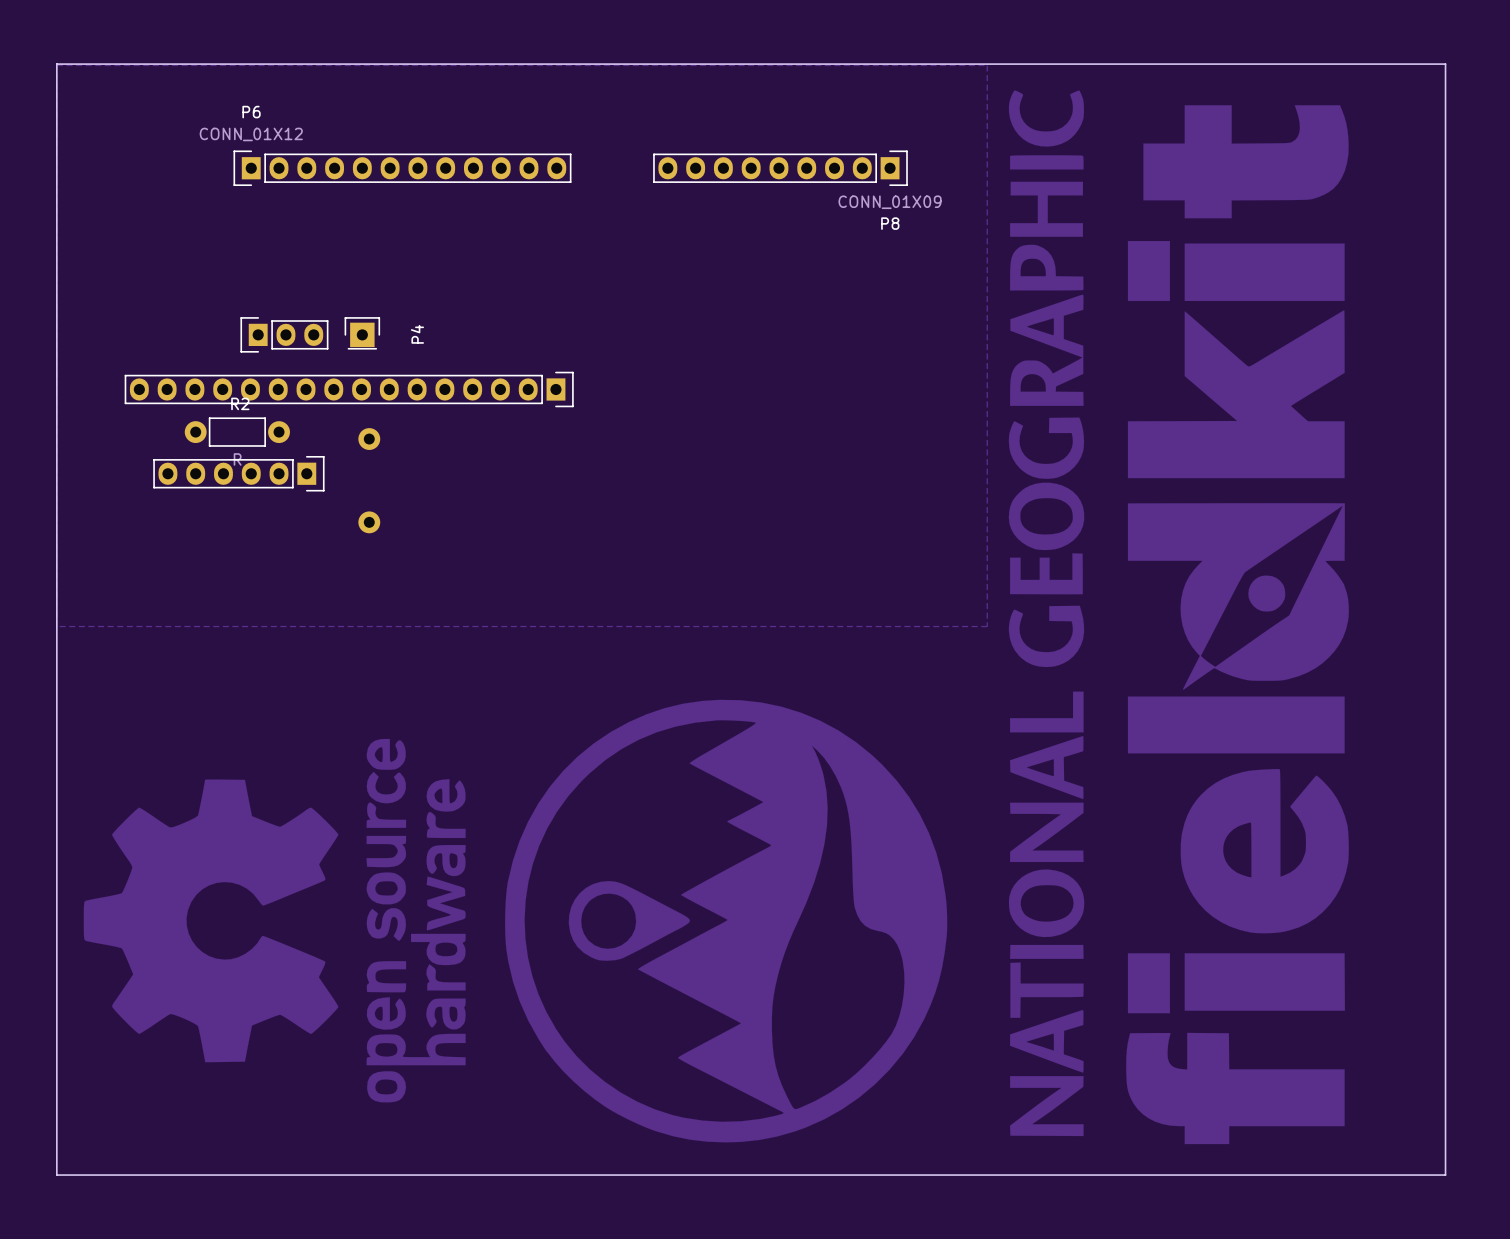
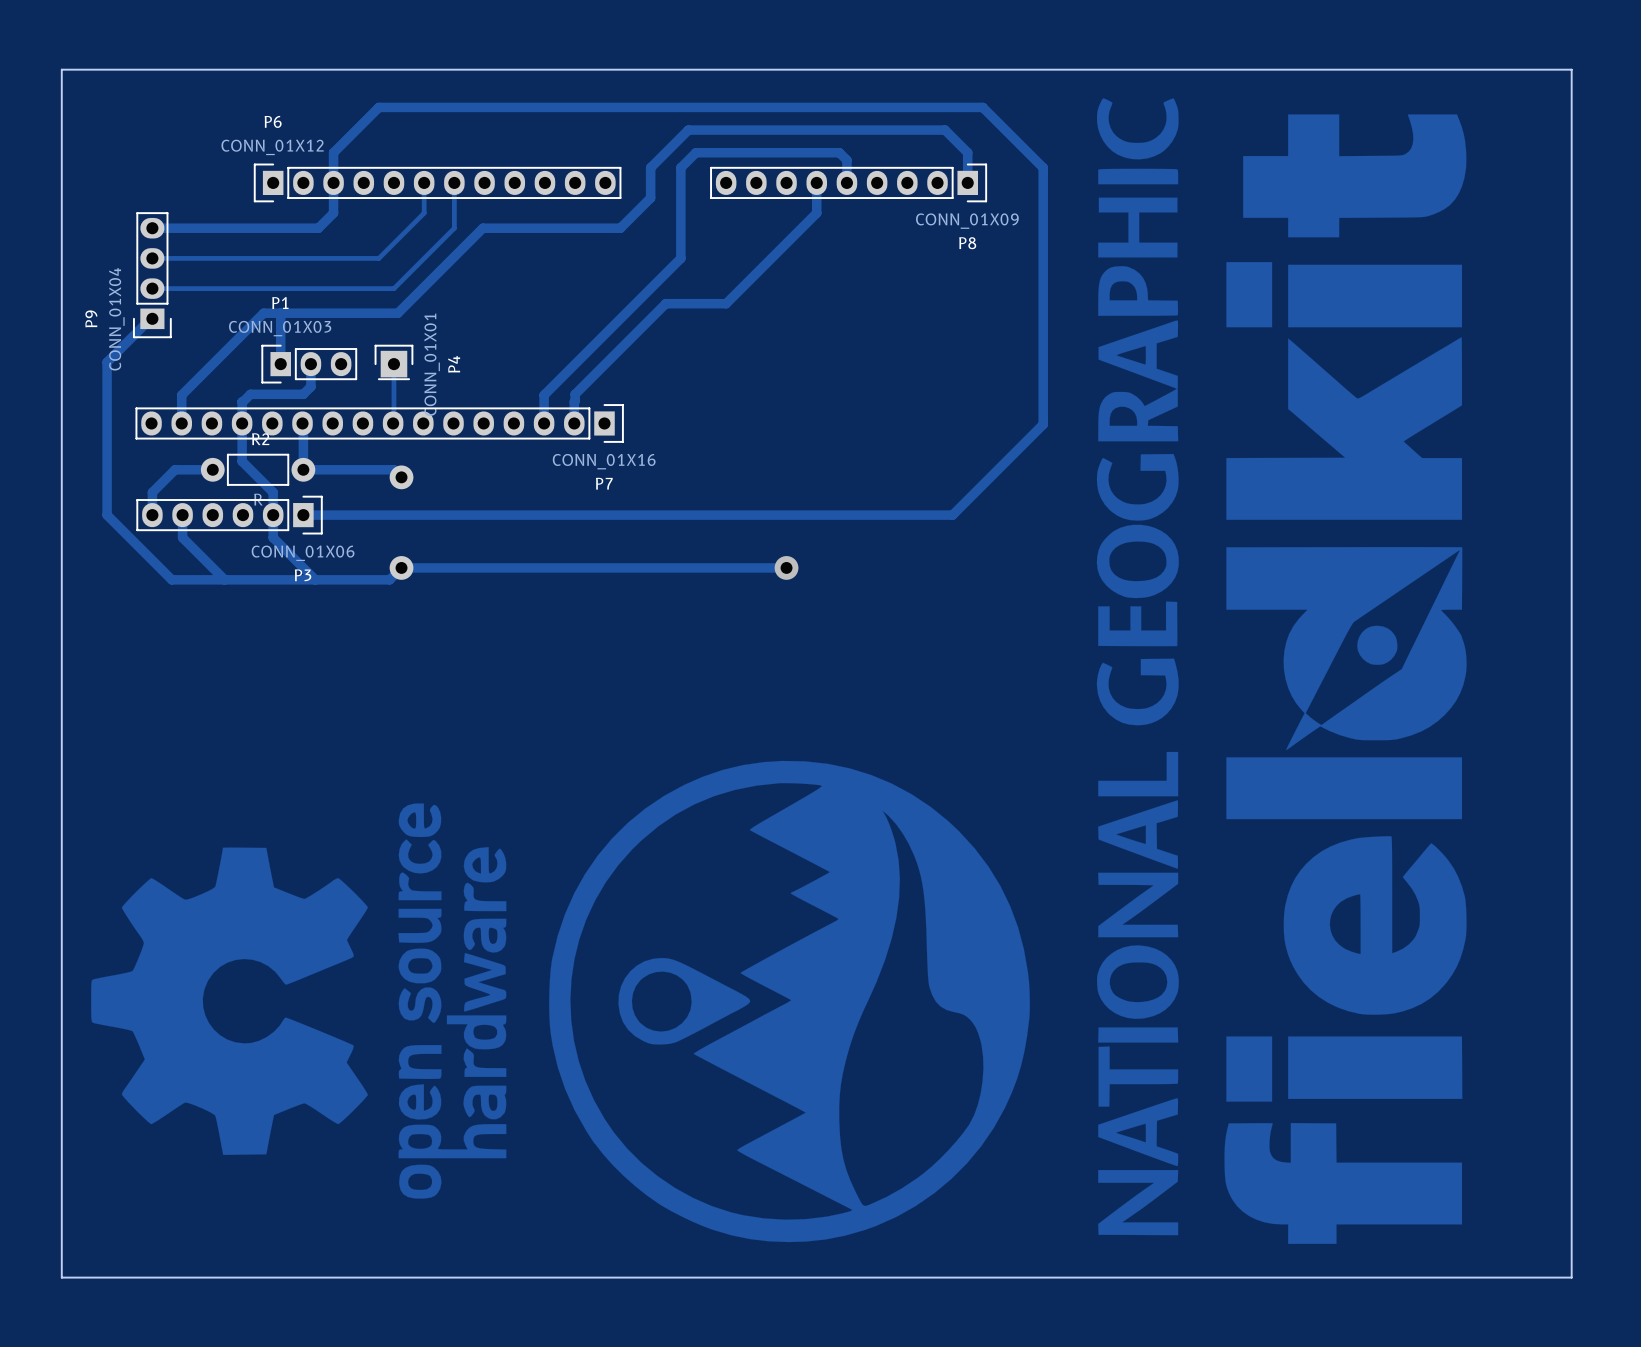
zone outline: (56, 65) (987, 65) (987, 626) (56, 626) (56, 65) -> none
track: none -> (424, 182) (424, 213) (378, 258) (152, 258)
track: none -> (816, 182) (816, 213) (726, 303) (665, 303) (575, 394) (574, 423) (574, 421)
track: none -> (846, 182) (846, 160) (839, 152) (695, 152) (680, 167) (680, 258) (544, 395) (544, 423)
track: none -> (967, 182) (967, 152) (945, 130) (688, 130) (650, 167) (650, 198) (620, 228) (482, 228) (397, 313) (263, 313) (181, 395) (181, 423) (181, 421)
track: none -> (454, 184) (454, 182) (454, 228) (393, 288) (152, 288)
track: none -> (152, 228) (318, 228) (333, 213) (333, 152) (378, 107) (982, 107) (1043, 167) (1043, 424) (952, 515) (303, 515)
P9: none -> CONN_01X04 (152, 275)
P1 name: none -> P1 (280, 303)
track: none -> (280, 313) (280, 364)
track: none -> (152, 318) (107, 362) (107, 515) (171, 579) (389, 579) (401, 567) (786, 567)
P1 value: none -> CONN_01X03 (280, 328)
track: none -> (310, 364) (310, 386) (303, 394) (250, 394) (242, 401) (242, 461) (273, 492) (273, 537) (315, 579)
track: none -> (393, 364) (393, 423)
P4 value: none -> CONN_01X01 (432, 364)
track: none -> (302, 425) (302, 423) (303, 469) (393, 469) (401, 477)
P7 value: none -> CONN_01X16 (604, 461)
track: none -> (212, 469) (175, 469) (152, 492) (152, 515)
P7 name: none -> P7 (604, 483)
track: none -> (182, 515) (182, 537) (224, 579)
P3: none -> CONN_01X06 (229, 515)
part: (238, 473) -> none
via: none -> (786, 567)

